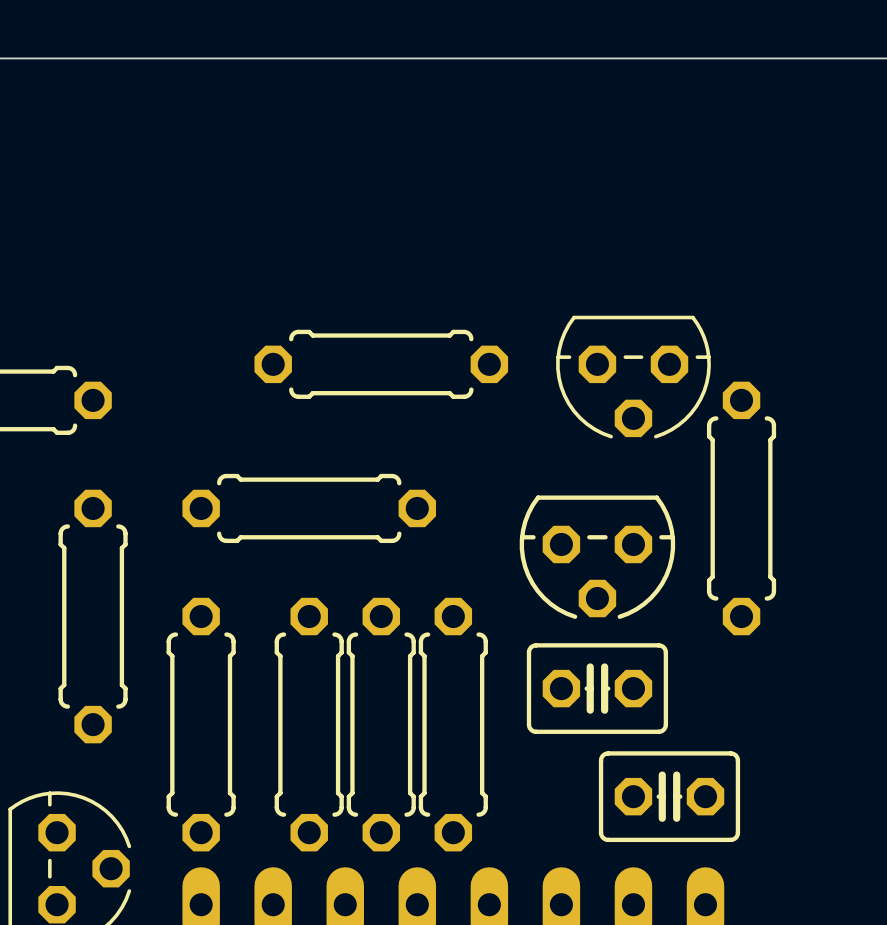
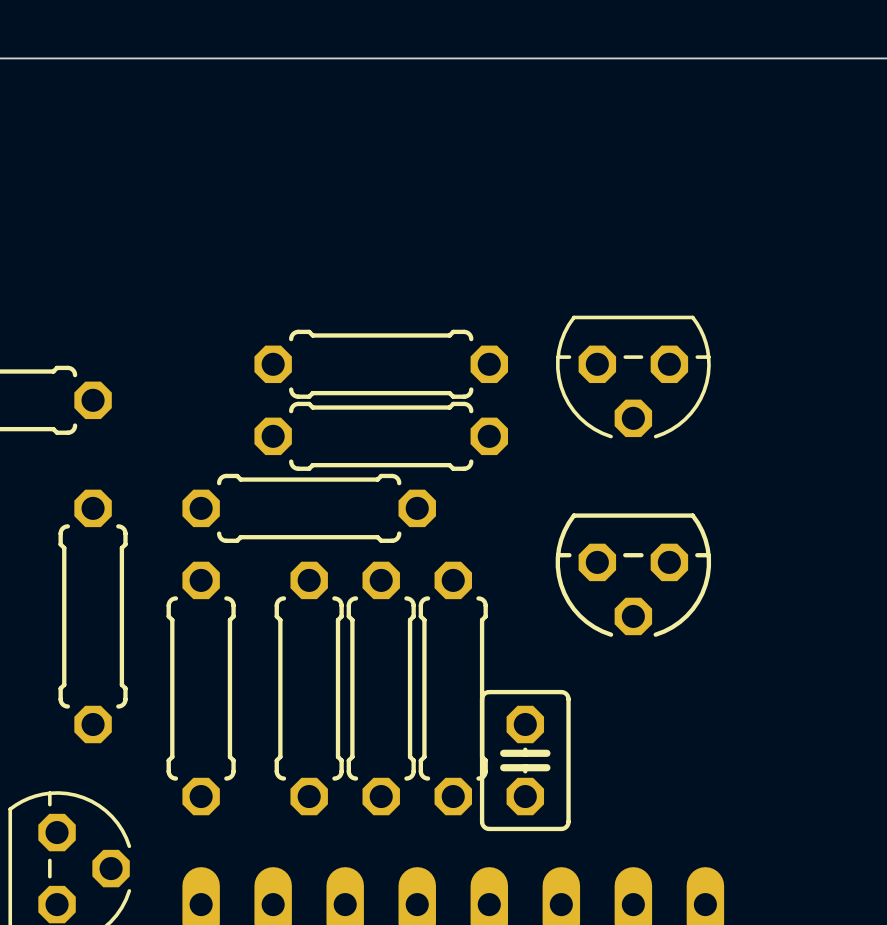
part: none -> (381, 436)
part: (741, 508) -> none
part position: (597, 557) -> (633, 575)
part: (597, 688) -> none
part position: (201, 724) -> (201, 688)
part position: (309, 724) -> (309, 688)
part position: (381, 724) -> (381, 688)
part position: (453, 724) -> (453, 688)
part: none -> (525, 760)
part: (669, 796) -> none

